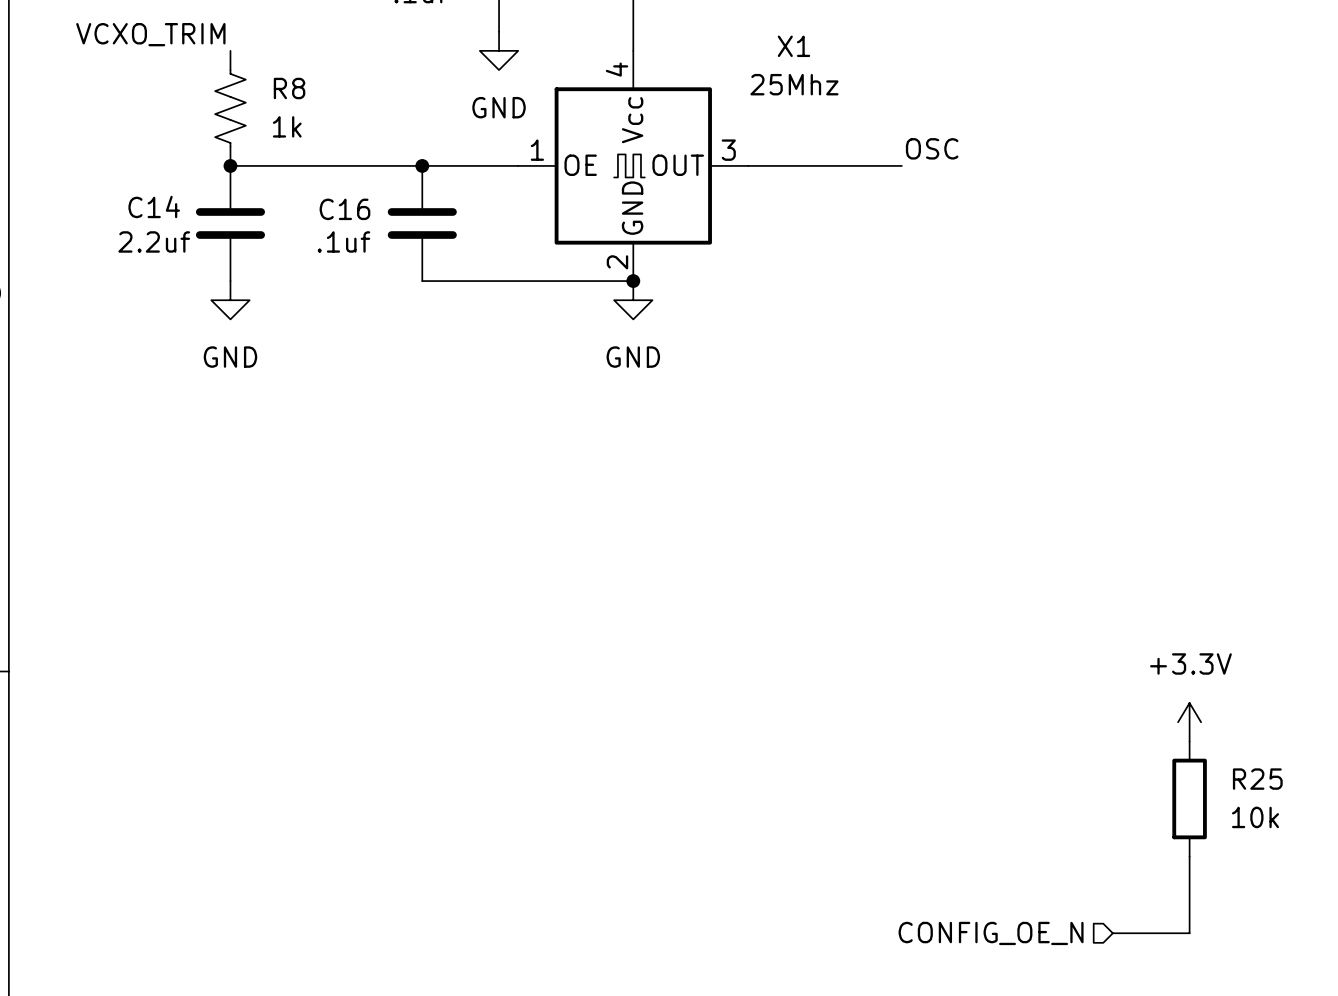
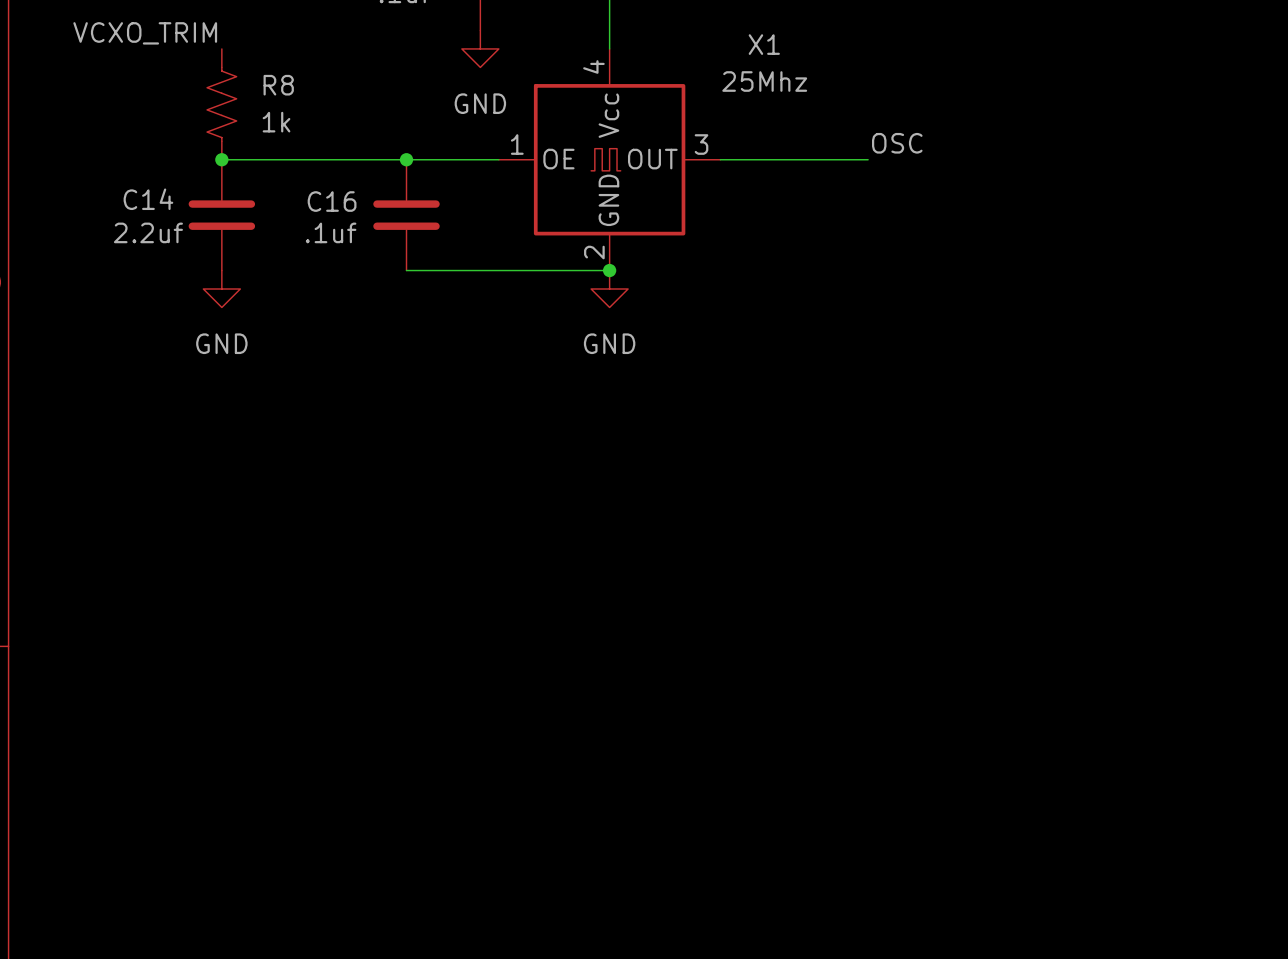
power symbol: +3.3V (1189, 722) -> none
R25: 10k (1189, 798) -> none
wire: (1189, 856) (1189, 933) (1112, 933) -> none
hierarchical label: CONFIG_OE_N (991, 933) -> none

